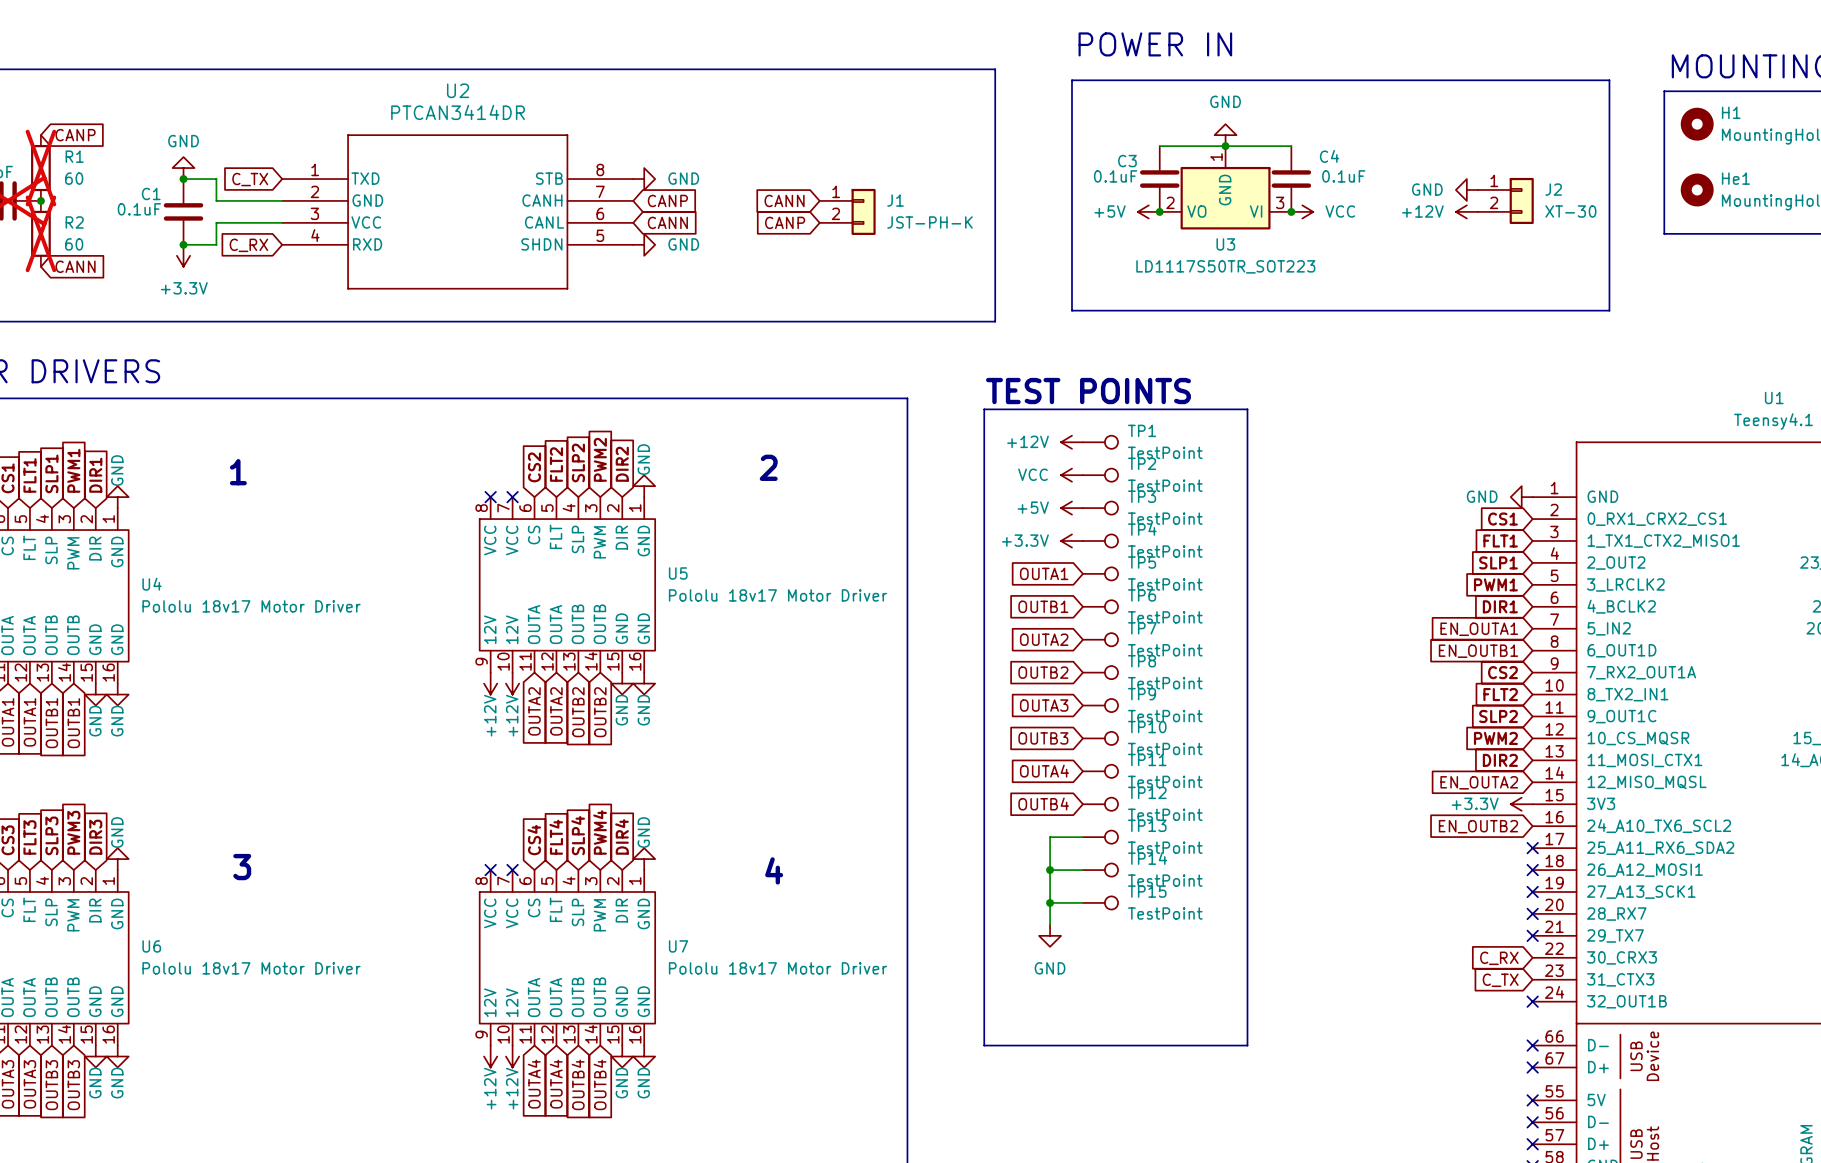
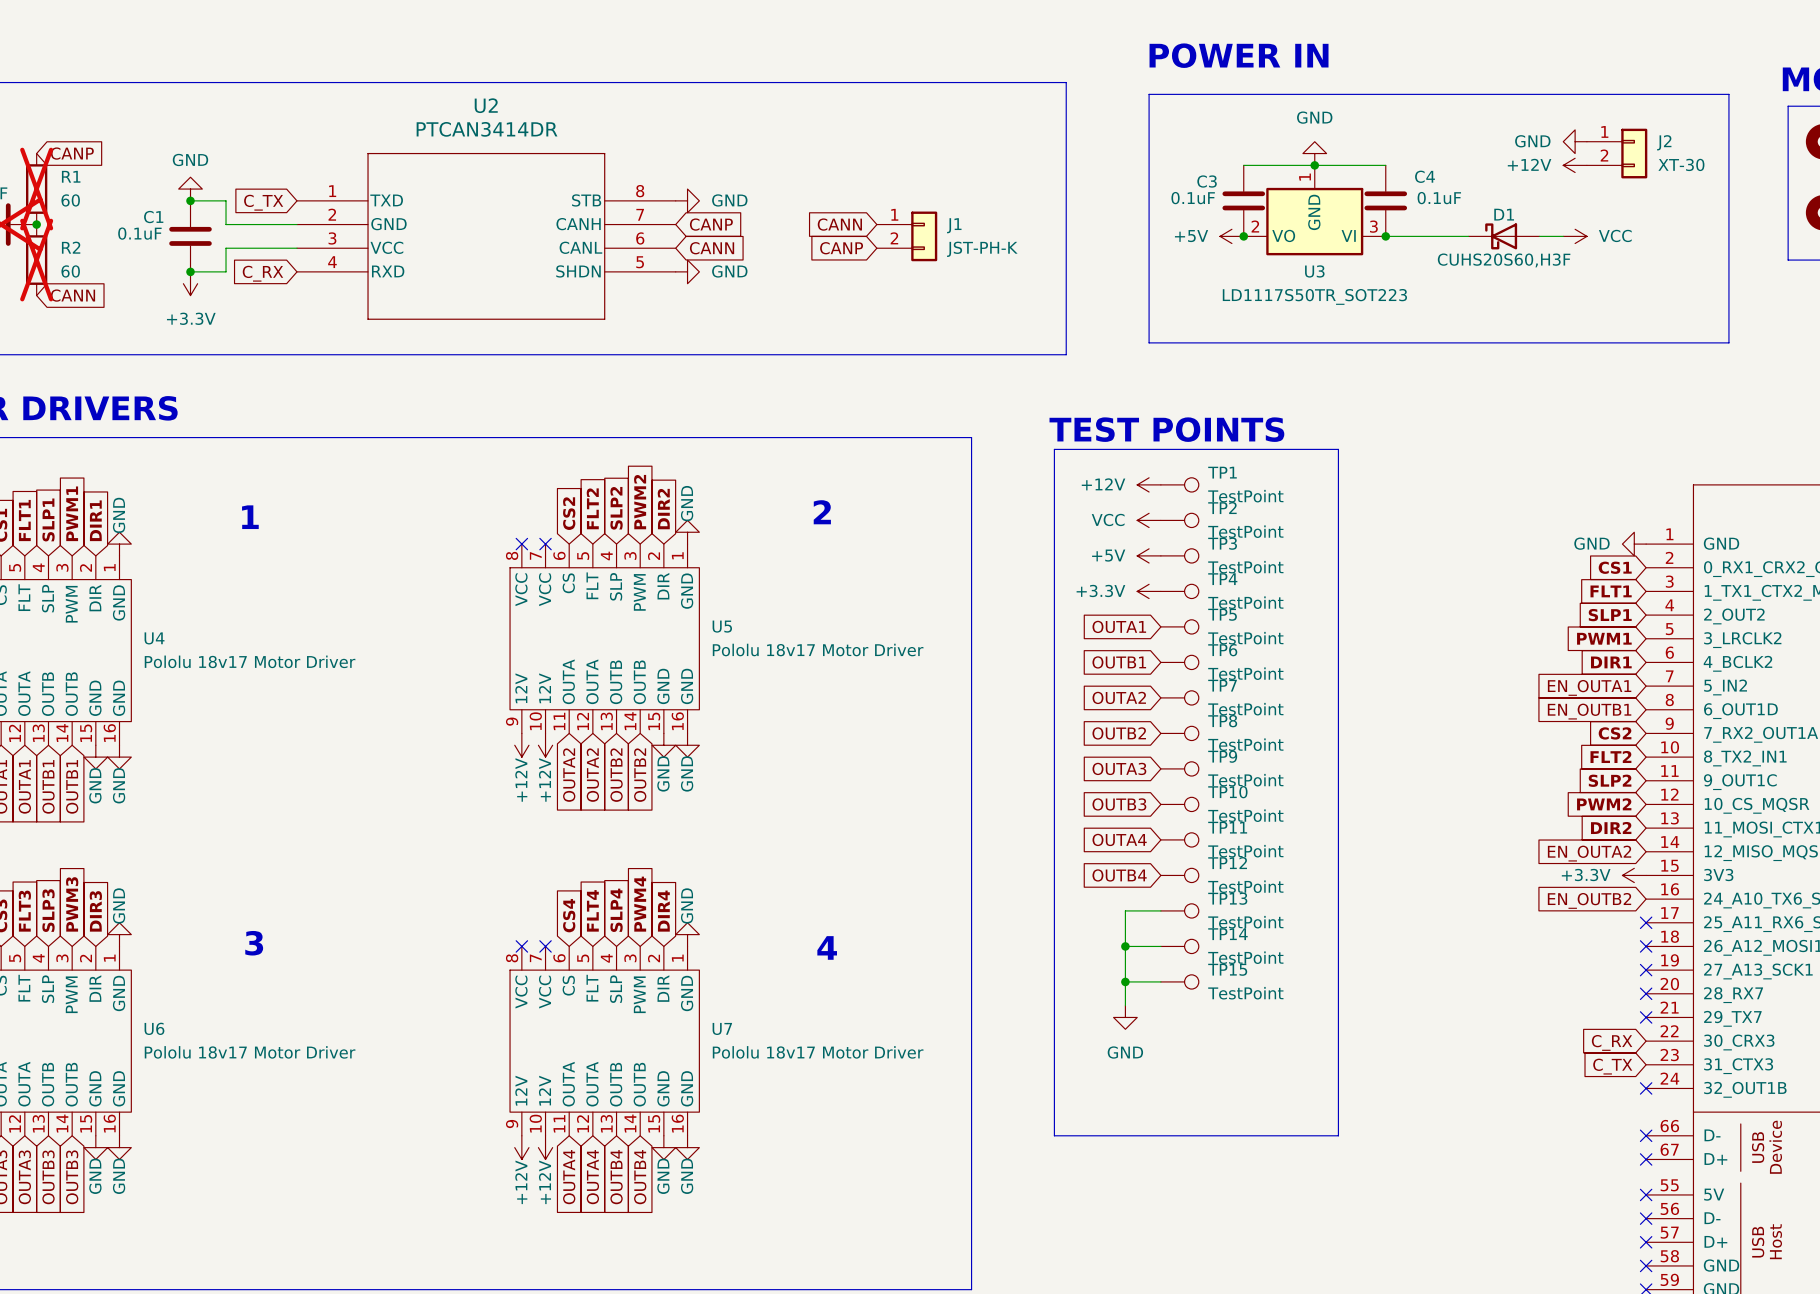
power symbol: none -> +12V (1575, 165)
power symbol position: GND (1466, 189) -> GND (1575, 141)
J2 position: (1505, 200) -> (1617, 153)
wire: none -> (1385, 236) (1468, 236)
power symbol: VCC (1302, 211) -> none
D1: none -> CUHS20S60,H3F (1504, 236)
wire: none -> (1539, 236) (1563, 236)
power symbol: +12V (1466, 211) -> VCC (1575, 236)

